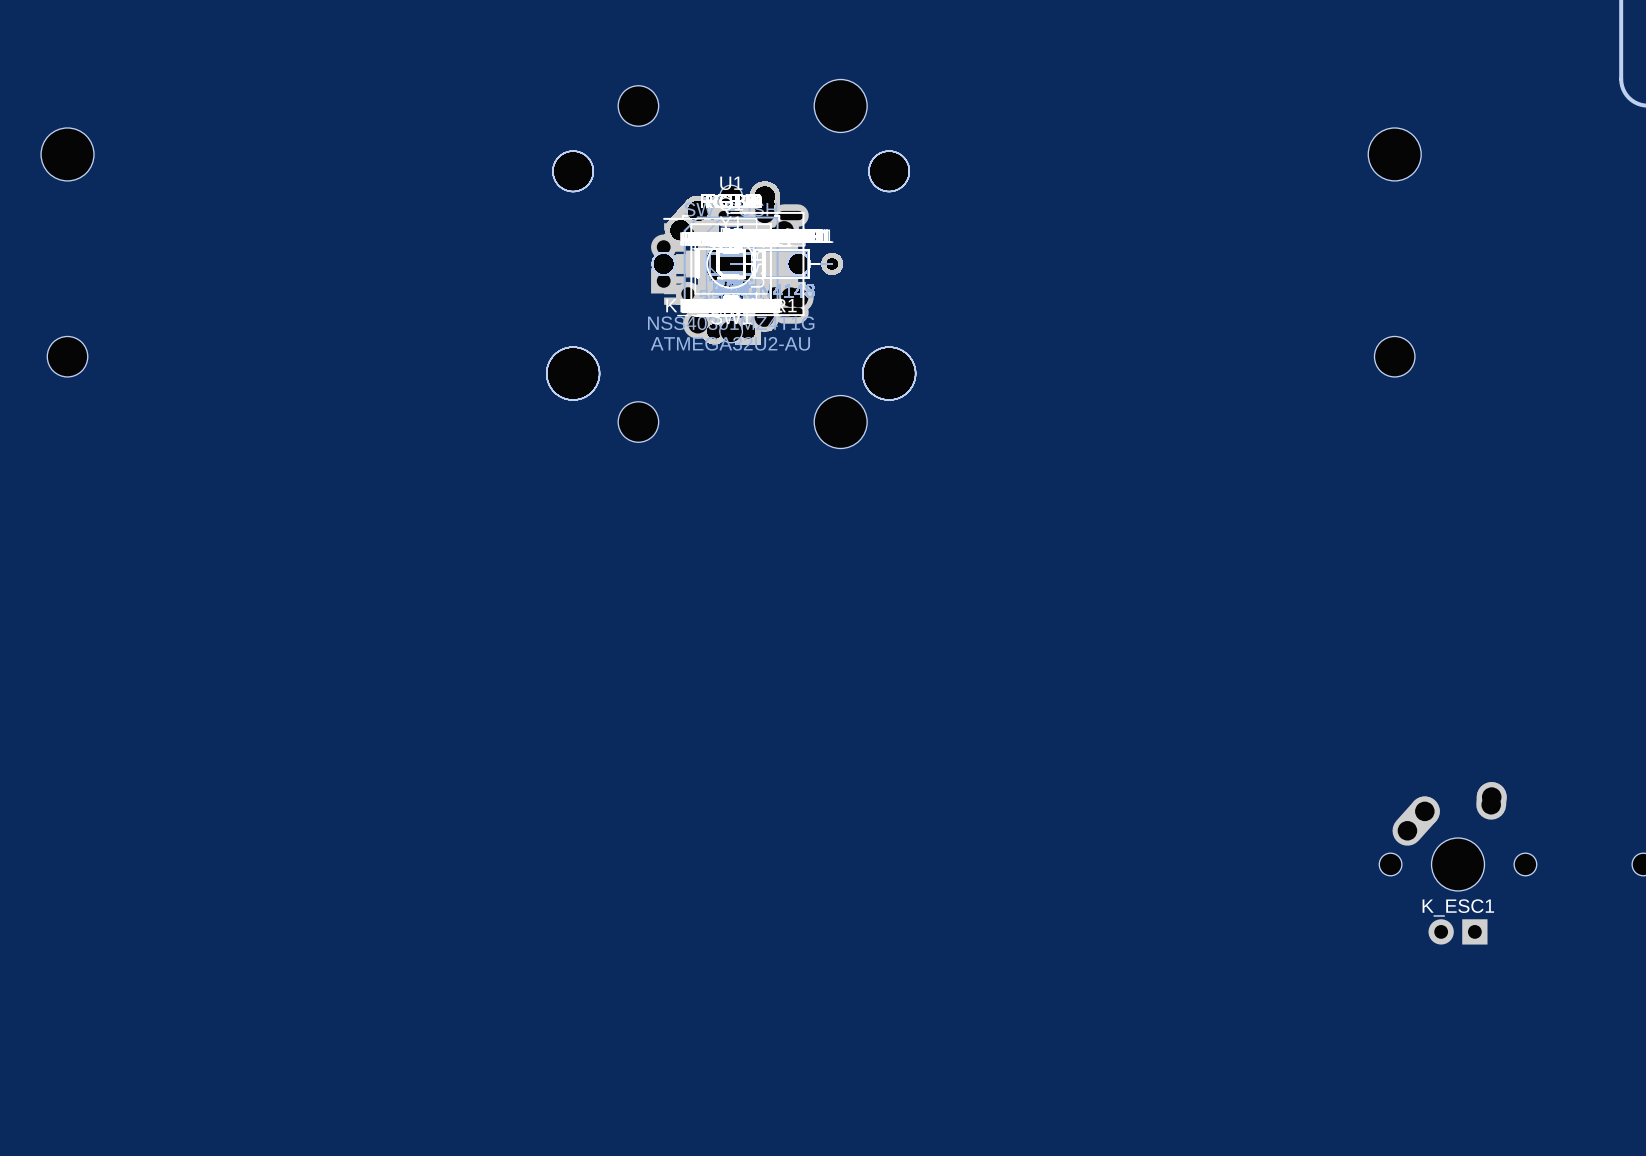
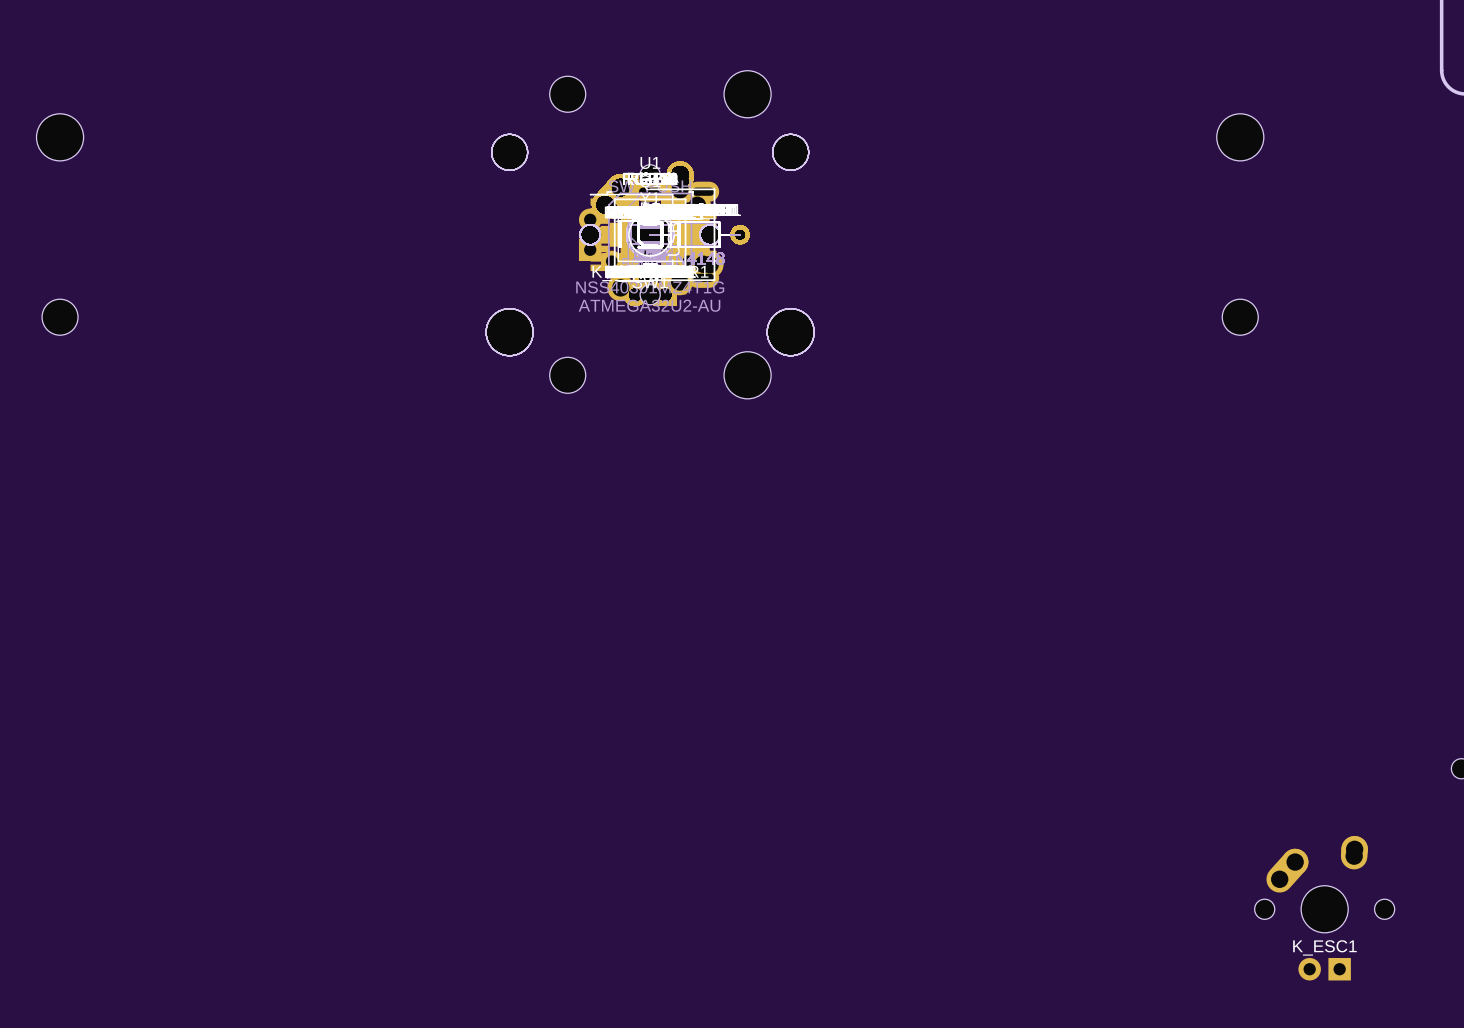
K_ESC1 position: (1458, 863) -> (1324, 908)

